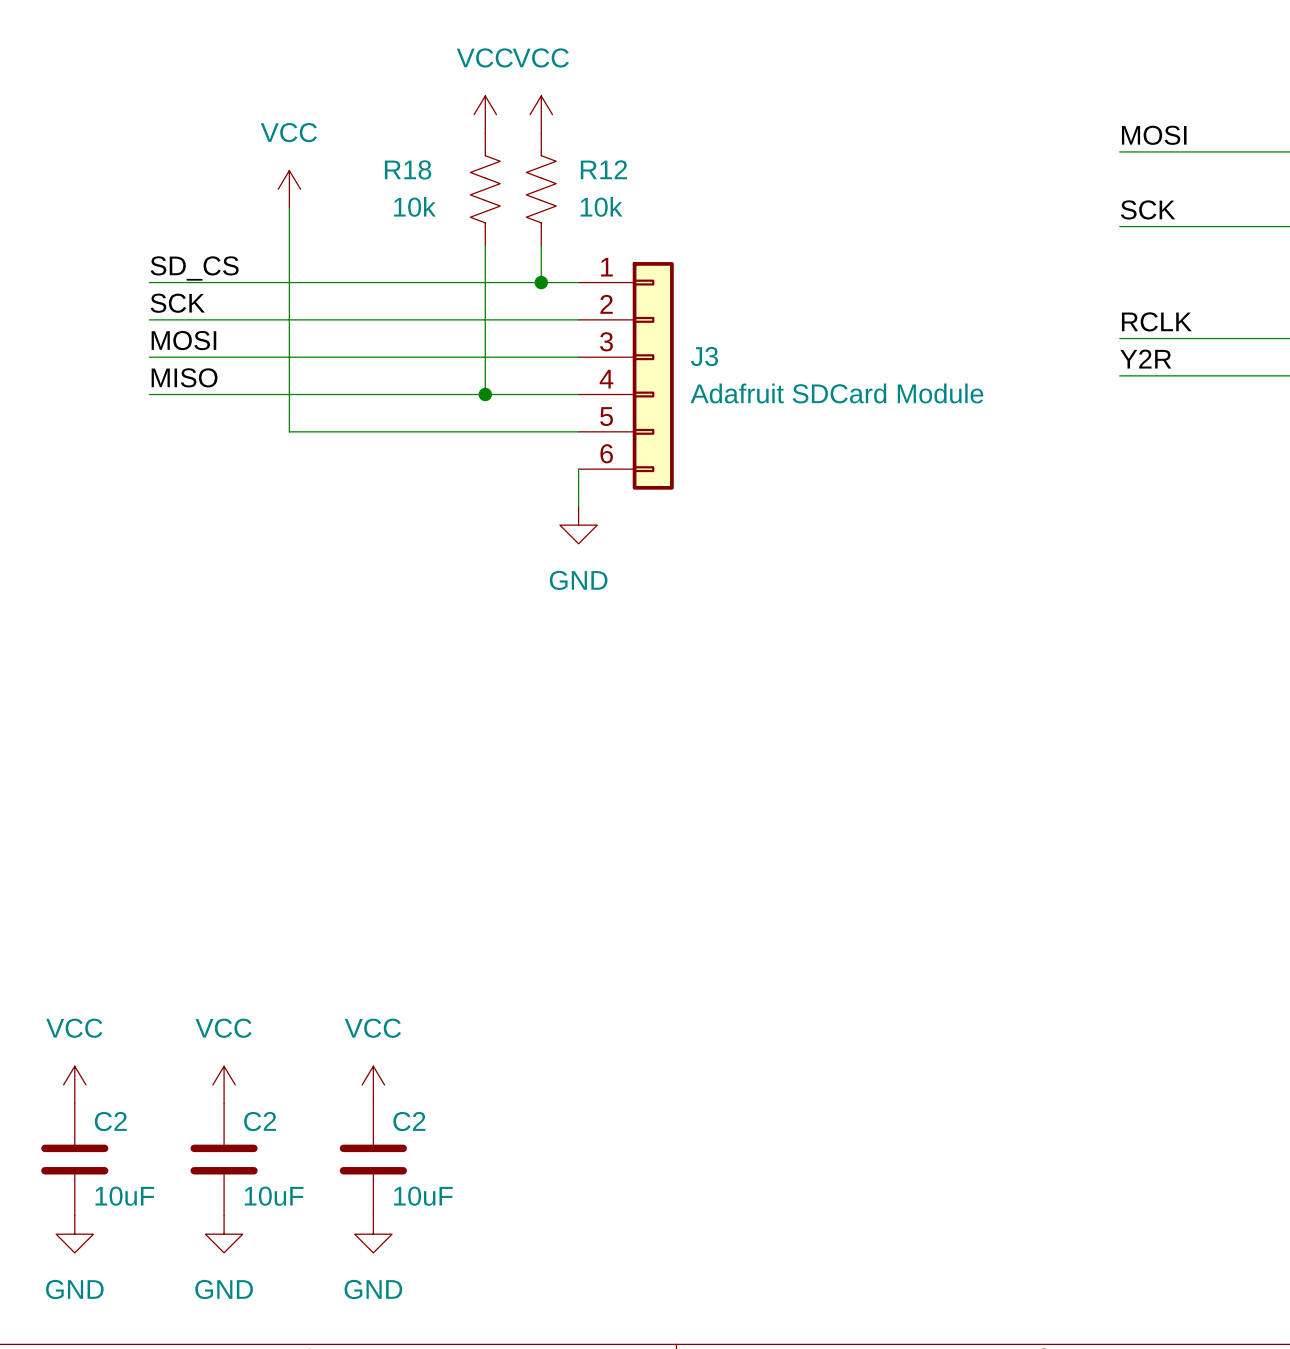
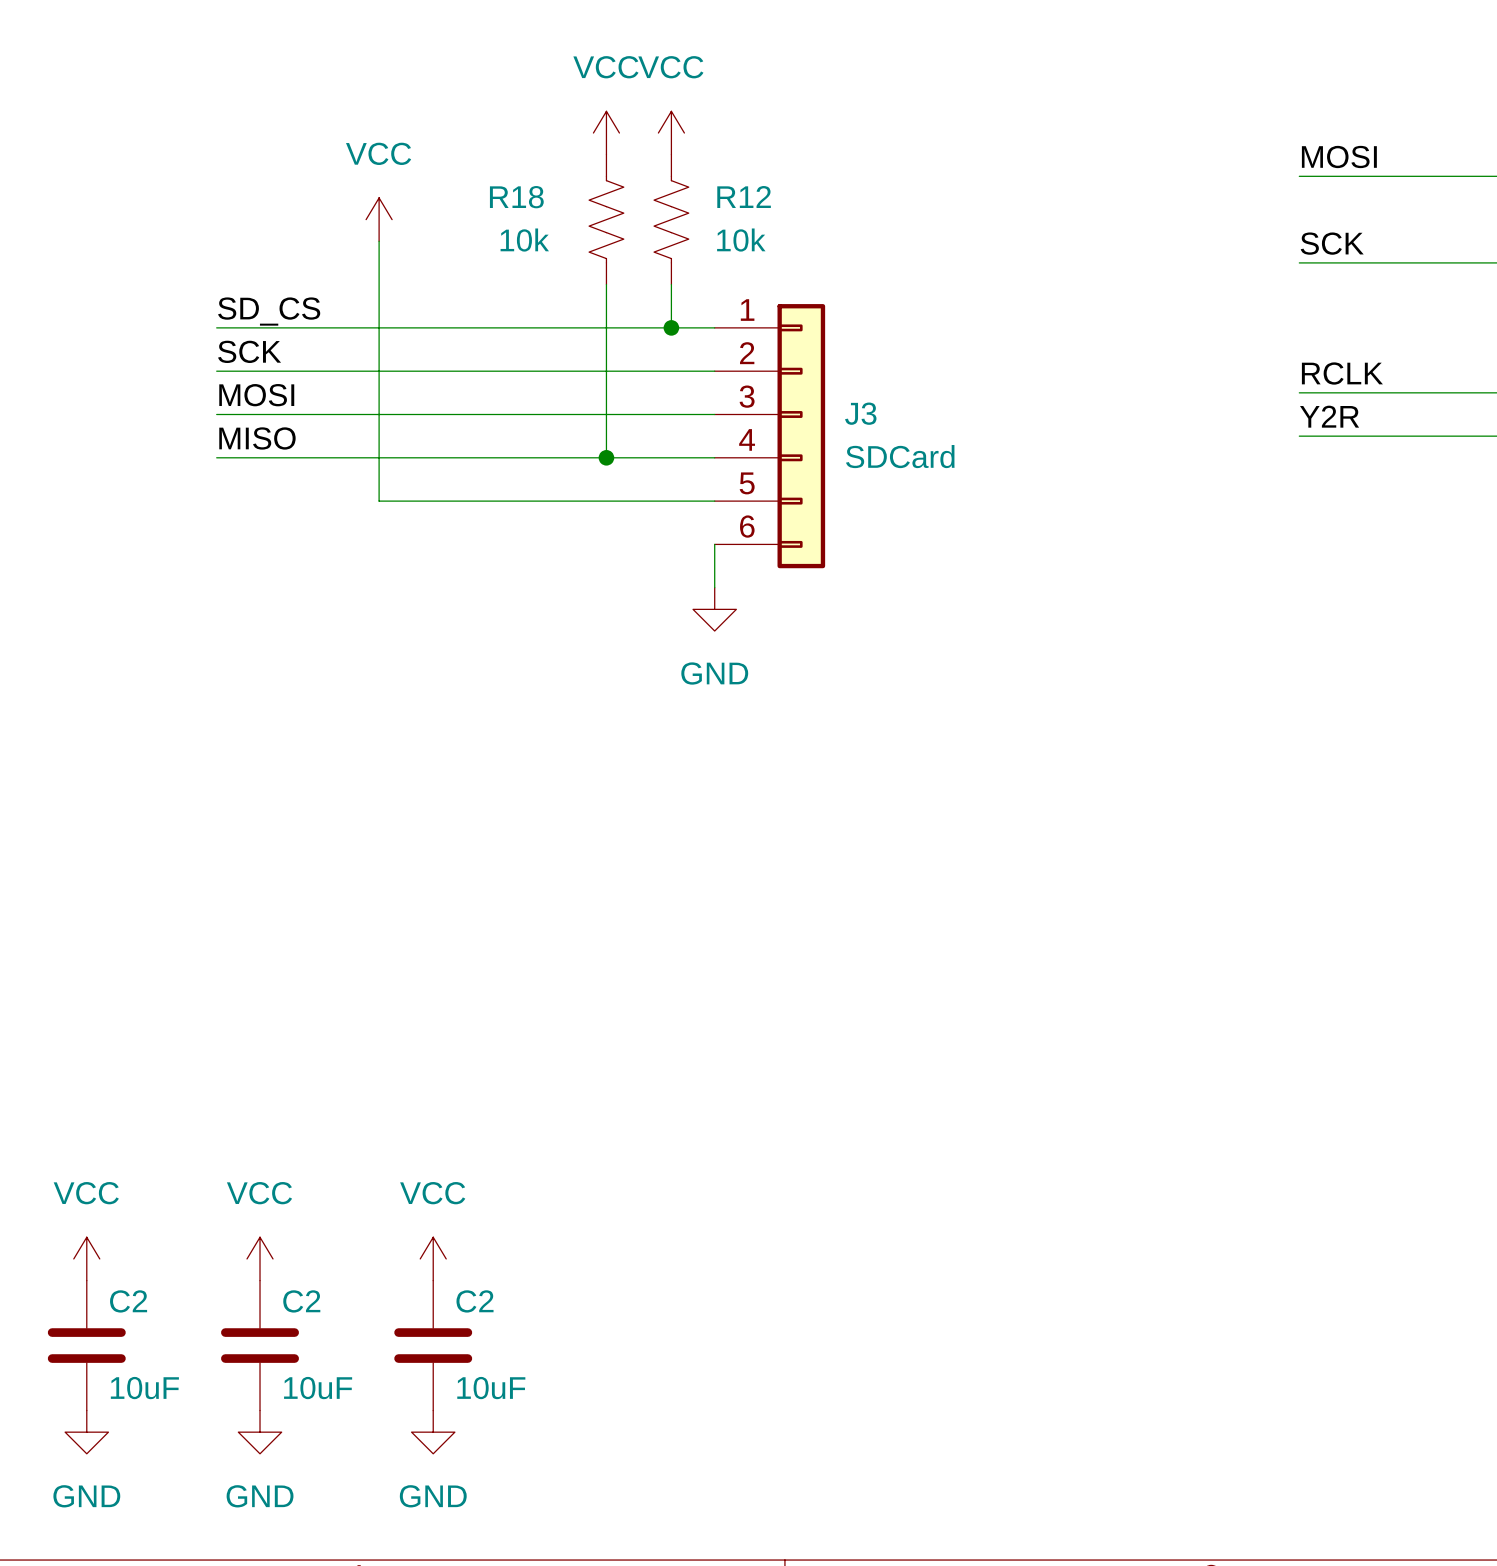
power symbol: VCC (485, 114) -> none
power symbol: none -> VCC (606, 133)
power symbol: VCC (541, 114) -> none
power symbol: none -> VCC (671, 133)
power symbol position: VCC (289, 189) -> VCC (379, 219)
R18 position: (485, 189) -> (606, 219)
R12 position: (541, 189) -> (671, 219)
wire: (289, 207) (289, 431) (326, 431) -> (379, 241) (379, 501)
wire: (485, 245) (485, 394) -> (606, 284) (606, 457)
wire: (541, 245) (541, 282) -> none
wire: none -> (671, 284) (671, 327) (714, 327)
label position: SD_CS (194, 268) -> SD_CS (269, 311)
wire: (149, 282) (186, 282) -> none
junction position: (541, 282) -> (671, 327)
label position: SCK (177, 303) -> SCK (249, 351)
wire: (149, 319) (186, 319) -> none
label position: MOSI (183, 340) -> MOSI (256, 395)
wire: (149, 357) (186, 357) -> none
J3 position: (626, 375) -> (769, 436)
label position: MISO (184, 377) -> MISO (257, 438)
J3 value: Adafruit SDCard Module (836, 393) -> SDCard (900, 456)
wire: (149, 394) (186, 394) -> none
junction position: (485, 394) -> (606, 457)
wire: (578, 469) (578, 506) -> (714, 544) (714, 587)
power symbol position: GND (578, 525) -> GND (714, 609)

